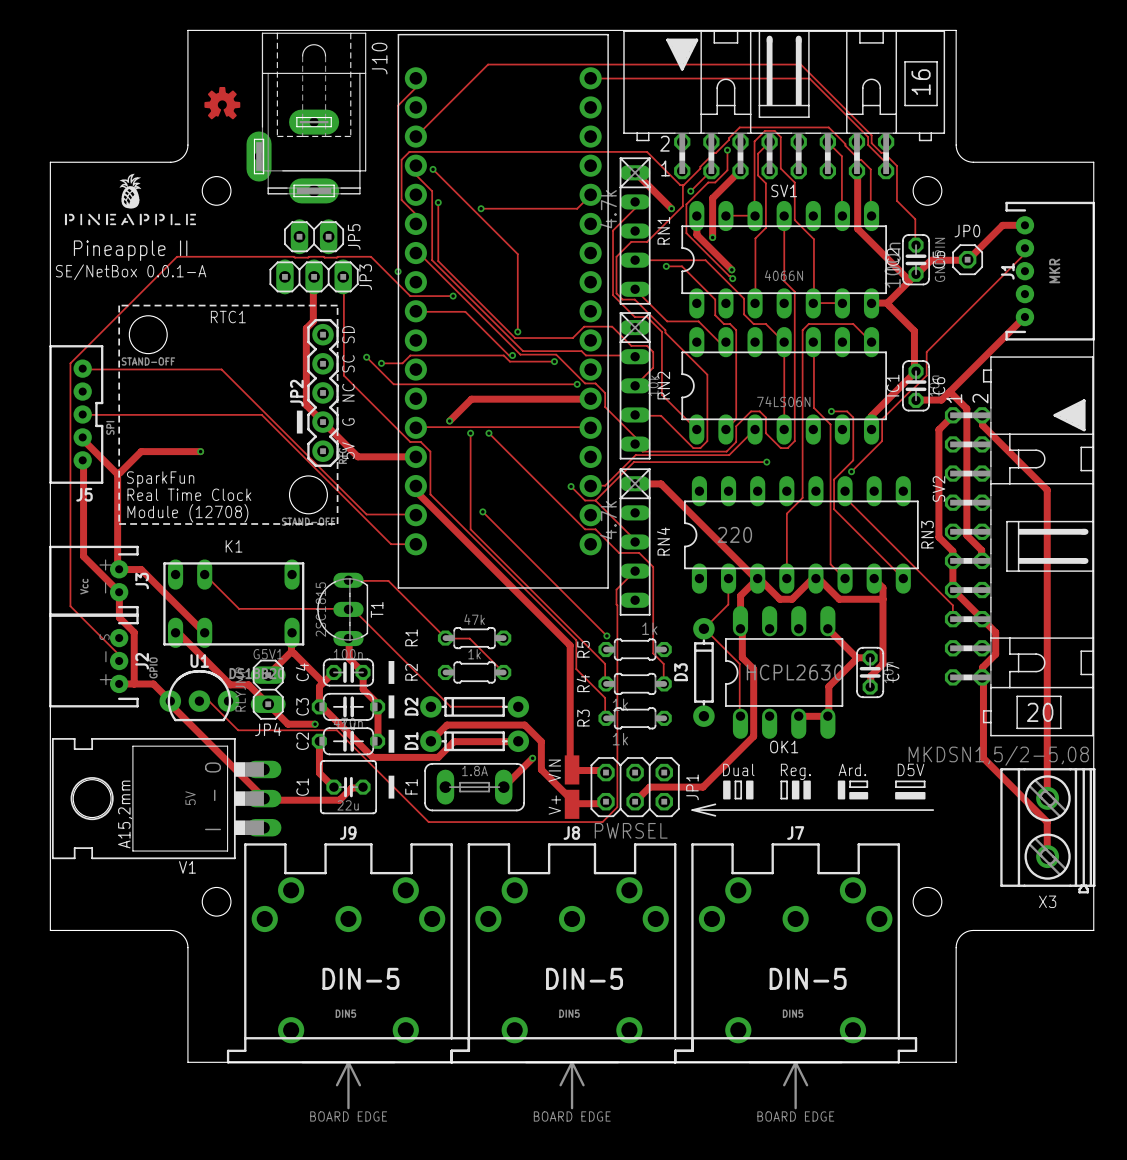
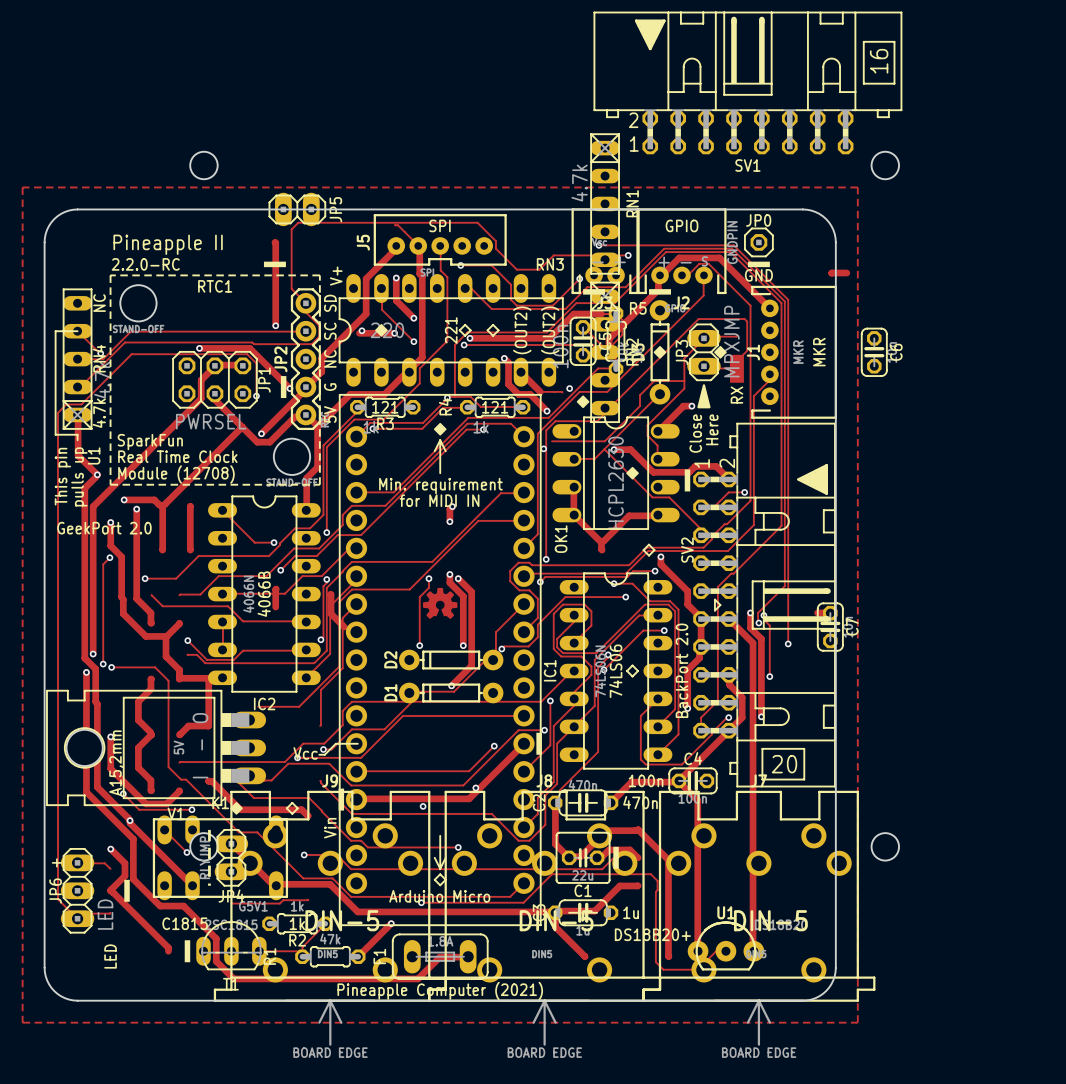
track: (415, 78) (415, 88) (398, 105) (398, 271) -> none
track: (590, 78) (809, 78) (868, 137) (868, 144) (885, 162) (886, 171) -> none
drawing: [204, 86, 241, 120] -> none
J10: (306, 118) -> none
track: (415, 136) (488, 64) (800, 64) (871, 135) (871, 143) (896, 165) (896, 200) (915, 219) (916, 245) -> none
track: (769, 141) (758, 153) (758, 175) (765, 183) (765, 227) (755, 238) (755, 303) -> none
track: (827, 141) (841, 156) (842, 216) -> none
track: (727, 150) (727, 170) (715, 182) (708, 182) (686, 204) (686, 233) (732, 278) -> none
via: (727, 150) -> none
track: (415, 165) (416, 175) (432, 191) (432, 260) (523, 351) (581, 351) (585, 355) (635, 356) -> none
track: (433, 169) (517, 254) (517, 331) -> none
via: (433, 169) -> none
track: (711, 171) (690, 191) -> none
track: (740, 171) (712, 198) (712, 237) -> none
track: (856, 171) (857, 228) (909, 280) -> none
track: (635, 172) (671, 208) -> none
drawing: [64, 173, 197, 226] -> none
track: (683, 185) (680, 185) (647, 151) (409, 151) (401, 159) (401, 199) (415, 213) (415, 223) -> none
via: (690, 191) -> none
track: (590, 194) (577, 208) (481, 208) -> none
track: (635, 201) (634, 208) (613, 230) (613, 295) (634, 317) (647, 317) (661, 331) (661, 394) (696, 429) -> none
track: (438, 202) (438, 261) (515, 338) (572, 338) (584, 326) (612, 326) (631, 345) -> (470, 338) (549, 338) (573, 314) (601, 314)
via: (438, 202) -> none
via: (481, 208) -> none
via: (671, 208) -> none
zone outline: none -> (22, 187) (857, 187) (857, 1022) (22, 1022) (22, 187)
track: (696, 216) (696, 234) (731, 269) -> none
track: (725, 216) (755, 216) (754, 141) (765, 130) (774, 130) (780, 137) (780, 168) (794, 182) (794, 220) (813, 239) (813, 303) (842, 303) -> none
track: (784, 216) (784, 281) (794, 291) (794, 441) (787, 448) (780, 448) (765, 433) (765, 417) (759, 411) (751, 411) (736, 426) (736, 441) (726, 451) (642, 451) (634, 443) (634, 436) (605, 407) (605, 393) (595, 383) (585, 383) (556, 354) (520, 354) (440, 274) -> (317, 426) (350, 394) (384, 394) (422, 357) (422, 276) (419, 273) (418, 245)
track: (871, 216) (870, 169) (828, 127) (739, 127) (682, 185) (682, 206) (647, 241) (631, 241) (616, 256) (616, 293) (622, 299) (634, 299) (707, 374) (707, 441) (700, 448) (693, 448) (661, 415) (635, 414) -> none
track: (1024, 225) (1002, 225) (966, 260) (931, 260) (887, 303) (914, 331) (916, 371) (871, 415) (871, 429) -> none
JP0 name position: JP0 (967, 231) -> JP0 (758, 220)
via: (712, 237) -> none
track: (1024, 248) (1024, 254) (926, 352) (926, 375) (882, 419) (882, 441) (851, 471) -> none
text position: Pineapple II (130, 250) -> Pineapple II (168, 244)
text: none -> SPI (439, 225)
text: none -> GPIO (681, 225)
track: (308, 256) (371, 256) (410, 296) (453, 296) -> (292, 228) (298, 222) (477, 222) (495, 241) (495, 248) (516, 269) (539, 269) (553, 255) (628, 255)
track: (308, 257) (177, 256) (70, 363) (70, 606) (118, 654) (119, 661) -> (291, 229) (291, 288) (305, 303)
JP3 footprint: [269, 259, 359, 295] -> [687, 323, 721, 382]
IC2 rotation: 0° (784, 259) -> 90° clockwise (264, 594)
IC2 position: (784, 259) -> (264, 594)
C5 position: (916, 259) -> (583, 341)
JP0 position: (967, 259) -> (758, 242)
track: (635, 260) (705, 260) (744, 298) (744, 314) (753, 324) (765, 324) (784, 342) (784, 429) -> none
track: (666, 266) (682, 266) (715, 299) (715, 315) (723, 324) (730, 324) (736, 330) (736, 419) (725, 429) -> none
via: (666, 266) -> none
via: (731, 269) -> none
board edge: (50, 271) (50, 162) (170, 162) (179, 159) (185, 153) (187, 145) (187, 30) (956, 30) (956, 145) (961, 157) (973, 162) (1093, 162) (1093, 930) (973, 930) (964, 932) (958, 939) (956, 945) (956, 1062) (841, 1062) -> (44, 242) (47, 229) (54, 219) (64, 211) (77, 209) (802, 209) (815, 211) (826, 219) (833, 229) (835, 242) (835, 967) (833, 980) (826, 991) (815, 998) (802, 1000)
track: none -> (274, 242) (275, 325)
via: (398, 271) -> none
J1 position: (1050, 271) -> (794, 352)
text: SE/NetBox 0.0.1-A (131, 272) -> none
track: none -> (396, 245) (395, 249) (366, 278) (366, 314) (321, 358) (321, 371) (261, 433)
track: none -> (440, 245) (440, 270) (447, 277) (447, 340) (419, 368) (419, 383) (383, 419) (354, 419) (326, 447) (326, 532)
track: none -> (598, 245) (733, 245) (788, 299) (788, 643)
via: none -> (598, 245)
track: (314, 276) (313, 321) (306, 328) (306, 405) (322, 421) -> none
track: (343, 276) (343, 375) (410, 441) (420, 441) (430, 451) (430, 494) (576, 640) (576, 669) (605, 697) (605, 718) -> none
JP3 name position: JP3 (365, 277) -> JP3 (681, 352)
via: (732, 278) -> none
via: none -> (628, 255)
track: (635, 289) (667, 321) (698, 321) (718, 341) (725, 342) -> none
drawing: none -> [263, 261, 286, 268]
drawing: none -> [747, 261, 770, 268]
text: none -> 2.2.0-RC (145, 264)
track: none -> (460, 265) (491, 265) (511, 284) (511, 299) (516, 305) (552, 305) (579, 278)
via: none -> (460, 265)
via: (453, 296) -> none
track: none -> (703, 275) (703, 295) (607, 391) (579, 391) (537, 433) (537, 534) (523, 548)
text: none -> GND (758, 275)
text: none -> V+ (336, 276)
track: none -> (396, 278) (396, 300) (413, 318)
via: none -> (396, 278)
via: none -> (579, 278)
track: (415, 311) (465, 311) (509, 355) (512, 355) -> none
part: (503, 311) -> none
track: (1024, 317) (941, 400) (916, 400) -> none
track: none -> (381, 288) (382, 309) (413, 341)
track: none -> (465, 288) (471, 288) (491, 309) (565, 309) (587, 287) (625, 287) (664, 248) (732, 248) (784, 301) (784, 586) (758, 612) (758, 623)
drawing: none -> [583, 289, 606, 295]
drawing: none -> [649, 289, 672, 295]
via: (517, 331) -> none
text: none -> NC (99, 303)
track: none -> (305, 303) (306, 313) (319, 325) (319, 336) (311, 344) (124, 342) (80, 386) (77, 387)
track: none -> (769, 308) (719, 257) (679, 257) (662, 274) (660, 274) (658, 289) (609, 339) (609, 344)
track: (813, 342) (813, 407) (830, 424) (830, 564) (845, 578) -> none
track: (871, 342) (853, 324) (808, 324) (802, 330) (802, 497) (786, 513) -> (681, 275) (688, 274) (699, 263) (708, 263) (750, 305) (750, 474)
via: none -> (413, 318)
via: (512, 355) -> none
drawing: none -> [375, 324, 388, 337]
track: (366, 357) (393, 384) (577, 384) -> none
via: (366, 357) -> none
line: none -> (465, 324) (459, 330) (465, 335) (470, 330) (465, 324)
line: none -> (493, 324) (487, 330) (493, 335) (498, 330) (493, 324)
via: none -> (275, 325)
track: none -> (583, 327) (615, 359) (616, 369) (598, 368) (548, 417) (468, 417) (393, 492) (356, 492)
track: (554, 361) (509, 361) (503, 355) (410, 355) (402, 363) (381, 363) -> none
via: (554, 361) -> none
text: none -> (OUT2) (522, 330)
text: none -> (OUT2) (550, 330)
line: none -> (77, 331) (55, 331) (55, 434) (77, 434) (77, 440)
track: none -> (77, 331) (100, 353)
track: none -> (305, 331) (130, 331) (103, 359) (77, 359)
text: none -> 221 (451, 330)
track: none -> (359, 333) (394, 333)
via: none -> (394, 333)
track: (82, 368) (221, 369) (366, 514) (415, 515) -> none
track: none -> (736, 335) (706, 336) (684, 358) (684, 388) (647, 425) (647, 435) (657, 445) (657, 459)
via: none -> (470, 338)
via: none -> (413, 341)
JP3 value: none -> MPXJMP (731, 341)
track: none -> (464, 345) (593, 345) (607, 359)
via: none -> (464, 345)
drawing: none -> [653, 346, 667, 359]
drawing: none -> [714, 346, 727, 359]
track: none -> (199, 348) (249, 348) (289, 388)
via: none -> (199, 348)
via: (577, 384) -> none
IC1 rotation: 0° (784, 385) -> 90° clockwise (616, 671)
IC1 position: (784, 385) -> (616, 671)
text: none -> MKR (819, 352)
IC1 name position: IC1 (893, 385) -> IC1 (550, 670)
via: none -> (100, 353)
track: (949, 391) (966, 408) (966, 535) (981, 550) (982, 560) -> none
track: none -> (504, 358) (508, 362) (508, 384) (518, 394) (530, 394) (547, 411)
via: none -> (504, 358)
track: (590, 398) (471, 399) (449, 421) -> none
track: none -> (242, 365) (215, 365) (201, 380) (201, 398) (93, 506) (93, 654)
track: none -> (703, 366) (706, 368) (736, 368) (736, 361) (747, 350) (747, 321) (744, 319) (698, 319) (597, 421) (555, 421) (546, 430) (546, 559)
RX: none -> (736, 368)
track: none -> (769, 374) (769, 380) (753, 396) (753, 525) (727, 551) (648, 551) (625, 573) (526, 573) (523, 576)
track: (831, 411) (847, 411) (853, 417) (853, 460) (834, 479) (834, 509) (903, 578) -> none
via: (831, 411) -> none
J5 rotation: 0° (76, 414) -> 90° clockwise (440, 239)
J5 position: (76, 414) -> (440, 239)
track: (82, 414) (261, 414) (391, 544) (415, 544) -> none
track: none -> (684, 381) (654, 381) (639, 395) (639, 406) (604, 441) (552, 441)
track: (953, 415) (938, 429) (938, 537) (952, 551) (953, 590) (995, 632) (995, 654) (982, 667) (983, 758) (1047, 822) (1047, 856) -> none
track: (982, 415) (982, 425) (1047, 490) (1047, 798) -> none
drawing: none -> [697, 384, 711, 409]
via: (449, 421) -> none
track: (323, 422) (357, 456) (415, 456) -> none
via: none -> (289, 388)
via: none -> (569, 388)
track: (567, 427) (415, 427) -> (540, 391) (520, 372)
track: none -> (214, 393) (215, 400) (257, 442) (269, 442) (294, 417) (303, 417) (305, 414) (317, 426)
track: none -> (660, 394) (594, 458) (574, 459)
track: (755, 429) (729, 455) (635, 455) (605, 485) (590, 486) -> none
drawing: none -> [576, 395, 590, 409]
track: none -> (256, 396) (256, 363) (247, 354) (131, 354) (81, 404) (66, 404) (58, 412) (58, 899) (77, 918) (83, 913) (110, 912)
via: none -> (256, 396)
track: none -> (454, 396) (454, 345) (467, 332) (547, 332) (576, 303) (614, 303) (665, 252) (730, 252) (781, 303) (781, 525) (717, 587) (717, 700) (701, 717) (701, 730)
track: (470, 433) (470, 529) (605, 663) (605, 683) -> none
track: (488, 433) (585, 529) (595, 529) (619, 552) (639, 552) (653, 566) (653, 653) (663, 663) (664, 683) -> none
via: (488, 433) -> none
track: (82, 437) (117, 474) -> none
track: none -> (691, 406) (683, 406) (657, 431)
via: none -> (691, 406)
track: none -> (357, 407) (356, 412) (323, 445) (323, 515) (310, 528) (294, 528) (269, 556) (198, 556) (176, 578) (145, 578)
text: none -> 121 (385, 407)
track: none -> (467, 407) (443, 407) (422, 428) (372, 428)
text: none -> 121 (495, 407)
track: none -> (523, 407) (480, 406) (470, 396) (449, 396) (423, 422) (370, 422) (356, 436)
via: none -> (547, 411)
text: none -> 4.7k (99, 413)
track: none -> (77, 414) (78, 455) (97, 474) (84, 488) (84, 658) (95, 669) (97, 787) (128, 818) (130, 823) (192, 885)
track: (200, 451) (141, 451) (117, 474) -> none
via: (200, 451) -> none
line: none -> (594, 418) (594, 528)
drawing: none -> [433, 422, 447, 436]
track: (82, 460) (83, 556) (119, 592) (119, 617) (134, 632) (134, 684) -> none
track: none -> (317, 426) (317, 467) (306, 478) (306, 510)
track: (766, 462) (633, 462) (595, 500) -> none
via: (766, 462) -> none
track: none -> (242, 427) (162, 506)
via: none -> (372, 428)
track: none -> (483, 429) (466, 429) (361, 535) (337, 535) (316, 556) (294, 556) (280, 570)
via: none -> (483, 429)
text: none -> Here (712, 429)
via: none -> (261, 433)
text: none -> Close (695, 433)
via: (851, 471) -> none
track: none -> (523, 436) (511, 423) (467, 423) (385, 505) (351, 505) (342, 515) (342, 525) (319, 548) (294, 548) (266, 576) (218, 576) (200, 594) (179, 595)
track: (117, 474) (119, 569) (141, 569) (204, 632) -> none
line: none -> (440, 440) (440, 473)
line: none -> (440, 440) (434, 451)
line: none -> (440, 440) (445, 451)
track: (635, 483) (661, 483) (757, 578) -> none
track: (415, 486) (416, 491) (570, 645) (570, 767) (572, 770) (603, 770) (605, 772) -> none
track: (571, 486) (585, 500) (595, 500) -> none
track: none -> (604, 449) (652, 497) (669, 497) (700, 528) (701, 535)
track: none -> (614, 449) (630, 449) (653, 472) (689, 472) (695, 466) (716, 466) (728, 479)
via: none -> (614, 449)
track: (845, 491) (845, 497) (952, 605) (953, 619) -> none
text: none -> U1 (94, 455)
track: (595, 500) (635, 541) -> none
drawing: none -> [626, 466, 639, 480]
drawing: none -> [684, 469, 691, 492]
track: (482, 511) (606, 635) -> none
via: (482, 511) -> none
via: none -> (97, 474)
text: none -> This pin (62, 476)
text: none -> pulls up (79, 476)
text: none -> Min. requirement (440, 486)
track: none -> (574, 487) (573, 515) (601, 542)
track: none -> (744, 492) (728, 492) (714, 506) (701, 507)
via: none -> (744, 492)
RN3 position: (801, 534) -> (451, 330)
RN3 name rotation: 0° (927, 534) -> 90° clockwise (550, 264)
RN3 name position: RN3 (927, 534) -> RN3 (550, 264)
track: none -> (124, 499) (154, 499) (162, 506)
via: none -> (124, 499)
text: none -> for MIDI IN (439, 500)
track: (786, 540) (786, 578) -> (750, 500) (712, 536) (712, 539) (703, 547) (646, 547) (629, 565) (531, 565) (529, 562) (518, 562) (510, 571) (510, 581) (519, 590) (529, 590) (537, 598) (537, 618) (523, 632)
RN4 rotation: 0° (635, 541) -> 180° (77, 359)
RN4 position: (635, 541) -> (77, 359)
track: none -> (162, 506) (162, 550)
track: none -> (190, 506) (190, 550)
track: none -> (452, 506) (449, 509) (449, 521)
via: none -> (452, 506)
SV2 position: (1019, 546) -> (764, 605)
track: none -> (136, 509) (136, 598) (150, 612) (151, 623)
via: none -> (136, 509)
track: none -> (222, 510) (254, 542) (274, 542)
track: none -> (657, 515) (629, 515) (601, 542)
track: none -> (523, 520) (478, 520) (409, 589) (351, 589) (339, 602) (339, 666) (299, 706) (258, 706)
via: none -> (449, 521)
track: none -> (110, 522) (110, 545) (121, 556) (123, 613) (145, 636) (166, 636) (179, 623)
via: none -> (110, 522)
text: none -> GeekPort 2.0 (104, 528)
track: (635, 571) (616, 589) (617, 807) (602, 822) (428, 822) (336, 730) (238, 730) (218, 710) -> (523, 492) (500, 493) (432, 561) (351, 561) (326, 587) (326, 650) (314, 663) (205, 663)
via: none -> (326, 532)
track: (204, 574) (239, 608) (353, 609) (450, 706) (518, 706) -> none
track: (728, 578) (728, 604) (703, 628) (739, 663) (740, 716) -> none
track: (757, 578) (740, 595) (742, 657) (753, 669) (753, 736) (703, 787) (649, 787) (635, 801) -> none
track: (757, 578) (779, 599) (792, 599) (811, 580) (815, 578) (819, 579) (839, 599) (882, 599) -> none
track: (874, 578) (882, 587) (882, 663) (870, 676) (870, 687) -> none
J3 rotation: 0° (93, 580) -> 90° clockwise (605, 251)
J3 position: (93, 580) -> (605, 251)
track: (348, 580) (388, 580) (445, 638) (469, 638) (503, 672) -> none
via: none -> (274, 542)
track: none -> (601, 542) (602, 550)
line: none -> (649, 544) (643, 550) (649, 555) (654, 550) (649, 544)
track: none -> (356, 548) (349, 548) (321, 576) (302, 576) (284, 593) (222, 594)
track: none -> (660, 556) (660, 564) (687, 591) (687, 604) (701, 619) (699, 658) (687, 669) (687, 708)
via: none -> (660, 556)
track: none -> (109, 557) (103, 564) (103, 664)
via: none -> (109, 557)
via: none -> (546, 559)
K1 position: (233, 603) -> (220, 857)
T1 rotation: 0° (342, 609) -> 90° clockwise (231, 945)
T1 position: (342, 609) -> (231, 945)
via: none -> (280, 570)
track: none -> (655, 571) (633, 571) (627, 576) (545, 576) (540, 582)
via: none -> (655, 571)
track: none -> (449, 574) (449, 582) (463, 596) (463, 645)
via: none -> (449, 574)
track: none -> (356, 576) (356, 580) (330, 606) (330, 654) (306, 677)
via: none -> (145, 578)
track: none -> (428, 578) (428, 587) (419, 597) (419, 645)
via: none -> (428, 578)
track: none -> (458, 578) (471, 592) (471, 665) (451, 685)
via: none -> (458, 578)
track: none -> (326, 579) (323, 586) (323, 637) (320, 639)
via: none -> (326, 579)
via: none -> (540, 582)
track: none -> (614, 583) (632, 583) (650, 601) (670, 601) (678, 609) (678, 734) (657, 754)
via: none -> (614, 583)
track: (827, 628) (856, 657) (828, 686) (827, 716) (798, 716) -> none
drawing: none -> [423, 587, 458, 619]
track: (175, 632) (178, 633) (230, 684) (248, 684) (288, 724) (315, 724) -> none
via: (606, 635) -> none
text: none -> 4066B (264, 594)
R1 position: (474, 638) -> (330, 956)
track: none -> (151, 595) (162, 606) (227, 606) (243, 621) (306, 622)
track: none -> (625, 597) (565, 597) (537, 624) (537, 637) (528, 646) (504, 646) (501, 648)
via: none -> (625, 597)
line: none -> (714, 599) (720, 605) (714, 610) (714, 599)
track: none -> (356, 604) (342, 618) (342, 668) (320, 690) (320, 725)
track: none -> (523, 604) (495, 632) (495, 649) (454, 691) (417, 691) (407, 701) (351, 701) (342, 710) (342, 725) (324, 743) (303, 743) (284, 762) (179, 762)
R5 name position: R5 (583, 649) -> R5 (638, 308)
R5 rotation: 0° (635, 649) -> 90° clockwise (616, 341)
R5 position: (635, 649) -> (616, 341)
track: none -> (750, 612) (750, 628) (761, 638) (761, 716)
via: none -> (750, 612)
track: none -> (574, 615) (573, 622) (557, 638) (557, 647) (562, 653) (596, 653) (645, 604) (668, 604) (675, 611) (675, 709) (657, 726)
track: none -> (657, 615) (639, 615) (594, 659) (594, 705) (557, 743) (557, 783) (545, 795) (545, 824) (529, 840) (518, 840) (491, 813) (351, 813) (320, 780)
track: none -> (763, 615) (763, 619) (769, 625) (769, 676)
via: none -> (763, 615)
J2 rotation: 0° (93, 661) -> 90° clockwise (681, 251)
J2 position: (93, 661) -> (681, 251)
drawing: [388, 661, 395, 753] -> none
track: none -> (728, 619) (753, 643) (753, 951)
track: none -> (222, 622) (222, 649)
via: none -> (758, 623)
C4 name position: C4 (302, 672) -> C4 (693, 758)
track: (333, 672) (319, 686) (319, 706) -> none
C4 rotation: 0° (348, 672) -> 180° (692, 780)
C4 position: (348, 672) -> (692, 780)
track: (363, 672) (363, 689) (377, 703) (377, 741) -> none
R2 name rotation: 0° (411, 672) -> 90° clockwise (297, 940)
R2 name position: R2 (411, 672) -> R2 (297, 940)
R2 position: (474, 672) -> (297, 923)
D3 position: (703, 672) -> (660, 352)
OK1 rotation: 0° (784, 672) -> 90° clockwise (616, 473)
OK1 position: (784, 672) -> (616, 473)
track: (268, 675) (291, 651) (323, 682) -> none
track: none -> (664, 630) (643, 630) (603, 669)
via: none -> (664, 630)
track: none -> (166, 636) (166, 656) (179, 669) (179, 679) (222, 677) (208, 680) (208, 725) (188, 726) (179, 734)
track: (119, 683) (153, 684) (170, 700) (170, 704) (265, 800) (339, 800) (351, 787) (363, 787) -> none
R4 position: (635, 683) -> (495, 407)
via: none -> (320, 639)
track: none -> (187, 640) (207, 659) (233, 659) (243, 650) (306, 649)
via: none -> (187, 640)
JP4 position: (268, 689) -> (231, 857)
track: none -> (574, 643) (591, 625) (591, 611) (584, 604) (562, 604) (553, 613) (553, 648) (561, 656) (581, 656) (591, 666) (591, 674) (574, 691) (573, 705) (553, 726) (553, 782) (537, 798) (537, 813) (523, 827)
via: none -> (788, 643)
via: none -> (419, 645)
via: none -> (463, 645)
U1 position: (199, 695) -> (725, 945)
via: none -> (501, 648)
via: none -> (93, 654)
track: none -> (608, 654) (608, 657) (598, 667) (598, 751) (559, 790)
via: none -> (608, 654)
track: (319, 706) (322, 707) (372, 757) (438, 757) (454, 741) (518, 741) -> none
C3 position: (348, 706) -> (583, 912)
part: none -> (440, 660)
via: none -> (103, 664)
line: none -> (632, 665) (627, 671) (632, 676) (638, 671) (632, 665)
track: none -> (111, 667) (155, 667) (168, 680) (168, 767) (181, 779) (186, 779) (238, 832) (257, 832) (303, 878) (332, 878) (351, 896) (510, 896) (523, 883)
via: none -> (111, 667)
via: none -> (603, 669)
R3 name rotation: 0° (583, 718) -> 90° clockwise (385, 423)
R3 name position: R3 (583, 718) -> R3 (385, 423)
track: none -> (574, 671) (571, 671) (541, 701) (412, 701) (384, 729) (351, 729) (331, 749) (323, 749)
R3 position: (635, 718) -> (385, 407)
text: none -> 74LS06 (615, 671)
text: none -> BackPort 2.0 (681, 670)
track: none -> (86, 672) (86, 792) (133, 839) (133, 879) (160, 906) (183, 906) (216, 938) (216, 961) (233, 978) (418, 978) (439, 957) (468, 956)
via: none -> (86, 672)
track: none -> (728, 674) (729, 684) (742, 697) (742, 717) (679, 780)
via: (315, 724) -> none
via: none -> (769, 676)
track: none -> (151, 679) (150, 689) (138, 701) (138, 720) (151, 734) (138, 747) (138, 767) (150, 780) (151, 790)
via: none -> (451, 685)
track: (319, 741) (319, 773) (333, 787) -> none
C2 position: (348, 741) -> (583, 802)
track: (430, 741) (447, 725) (524, 725) (541, 741) (541, 769) (571, 800) (572, 804) (603, 803) (605, 801) -> none
track: none -> (657, 698) (640, 715) (640, 759) (645, 764) (681, 764) (728, 717)
OK1 name position: OK1 (784, 747) -> OK1 (561, 539)
track: none -> (550, 700) (550, 745) (523, 771)
via: none -> (550, 700)
via: none -> (687, 708)
track: (532, 758) (503, 787) -> none
via: (532, 758) -> none
track: none -> (523, 715) (403, 715) (361, 757) (297, 757)
via: none -> (761, 716)
via: none -> (728, 717)
VIN: (572, 769) -> none
text: Dual (738, 769) -> none
text: Ard. (852, 769) -> none
text: D5V (911, 769) -> none
text: Reg. (795, 771) -> none
drawing: [388, 775, 395, 799] -> none
track: none -> (544, 730) (518, 730) (463, 785) (351, 785) (329, 763) (288, 763) (271, 780) (264, 780)
via: none -> (544, 730)
drawing: [723, 780, 731, 800] -> none
drawing: [746, 780, 754, 800] -> none
drawing: [791, 780, 811, 800] -> none
drawing: [837, 780, 869, 800] -> none
line: (735, 781) (741, 781) (741, 798) (735, 798) (735, 781) -> none
line: (781, 781) (787, 781) (787, 798) (781, 798) (781, 781) -> none
line: (850, 781) (867, 781) (867, 787) (850, 787) (850, 781) -> none
line: (895, 781) (924, 781) (924, 787) (895, 787) (895, 781) -> none
drawing: none -> [536, 732, 542, 755]
track: none -> (110, 736) (110, 768) (145, 803) (166, 803) (179, 790)
via: none -> (110, 736)
C1 name rotation: 0° (302, 787) -> 90° clockwise (583, 890)
C1 name position: C1 (302, 787) -> C1 (583, 890)
C1 position: (348, 787) -> (583, 857)
F1 position: (474, 787) -> (440, 956)
JP1 position: (635, 787) -> (214, 379)
JP1 name position: JP1 (692, 787) -> JP1 (264, 380)
drawing: [895, 792, 926, 800] -> none
line: none -> (357, 743) (335, 743) (324, 754) (319, 754)
track: none -> (523, 743) (469, 798) (356, 799)
track: none -> (494, 746) (469, 771) (356, 771)
via: none -> (494, 746)
via: none -> (323, 749)
text: none -> Vcc (305, 753)
V+: (572, 804) -> none
line: (715, 804) (692, 810) -> none
via: none -> (297, 757)
line: (692, 810) (933, 810) -> none
line: (692, 810) (715, 815) -> none
X3: MKDSN1,5/2-5,08 (1047, 830) -> none
track: none -> (208, 780) (212, 781) (240, 809) (301, 809) (308, 815)
track: none -> (236, 780) (253, 798) (309, 798) (351, 840) (361, 840) (367, 847) (458, 847)
text: none -> 100n (646, 780)
track: none -> (679, 780) (631, 782) (611, 802)
track: none -> (679, 780) (697, 800) (698, 951)
via: none -> (475, 787)
drawing: none -> [338, 788, 345, 811]
track: none -> (123, 793) (139, 809) (191, 809)
via: none -> (123, 793)
drawing: none -> [230, 802, 243, 815]
line: none -> (292, 802) (286, 808) (292, 813) (297, 808) (292, 802)
track: none -> (555, 802) (555, 844) (569, 857) (580, 856) (606, 830) (638, 829)
text: none -> 470n (640, 802)
via: none -> (423, 806)
via: none -> (191, 809)
via: none -> (130, 820)
text: none -> Vin (330, 828)
track: none -> (164, 829) (186, 852)
line: none -> (209, 829) (209, 885)
track: none -> (638, 829) (668, 860) (668, 956)
line: none -> (440, 835) (440, 868)
track: none -> (231, 843) (273, 885) (330, 884) (357, 911) (555, 912)
drawing: none -> [613, 846, 619, 869]
via: none -> (458, 847)
track: none -> (110, 849) (124, 863) (124, 875) (110, 890) (168, 947) (168, 951)
via: none -> (110, 849)
via: none -> (186, 852)
track: none -> (304, 854) (336, 854) (351, 869) (602, 869) (613, 858)
via: none -> (304, 854)
line: none -> (434, 857) (440, 868)
line: none -> (445, 857) (440, 868)
track: none -> (597, 857) (601, 857) (609, 849) (629, 849) (638, 857)
text: none -> + (56, 862)
track: none -> (77, 862) (104, 863) (110, 868)
board edge: (50, 930) (170, 930) (182, 935) (187, 947) (187, 1062) -> (44, 874) (44, 972) (49, 984) (54, 991) (61, 996) (73, 1000) (176, 1000)
line: none -> (440, 874) (434, 879) (440, 885) (445, 879) (440, 874)
drawing: none -> [124, 879, 130, 902]
track: none -> (638, 885) (619, 885) (594, 911) (557, 911) (555, 912)
JP6: none -> LED (77, 890)
text: none -> Arduino Micro (439, 896)
track: none -> (308, 899) (283, 900) (279, 903) (231, 903)
track: none -> (421, 902) (523, 902) (552, 874) (650, 874) (657, 880) (655, 962) (663, 969) (697, 969) (716, 951) (725, 951)
via: none -> (421, 902)
track: none -> (555, 912) (555, 927) (585, 956)
text: none -> 1u (631, 912)
track: none -> (391, 923) (358, 956)
via: none -> (391, 923)
text: none -> C1815 (185, 923)
text: none -> 1k (297, 923)
track: none -> (325, 923) (302, 947) (302, 956) (302, 956) (302, 951) (259, 951) (259, 951)
text: none -> DS18B20+ (652, 934)
drawing: none -> [184, 940, 191, 963]
text: none -> LED (110, 956)
text: none -> Pineapple Computer (2021) (440, 991)

